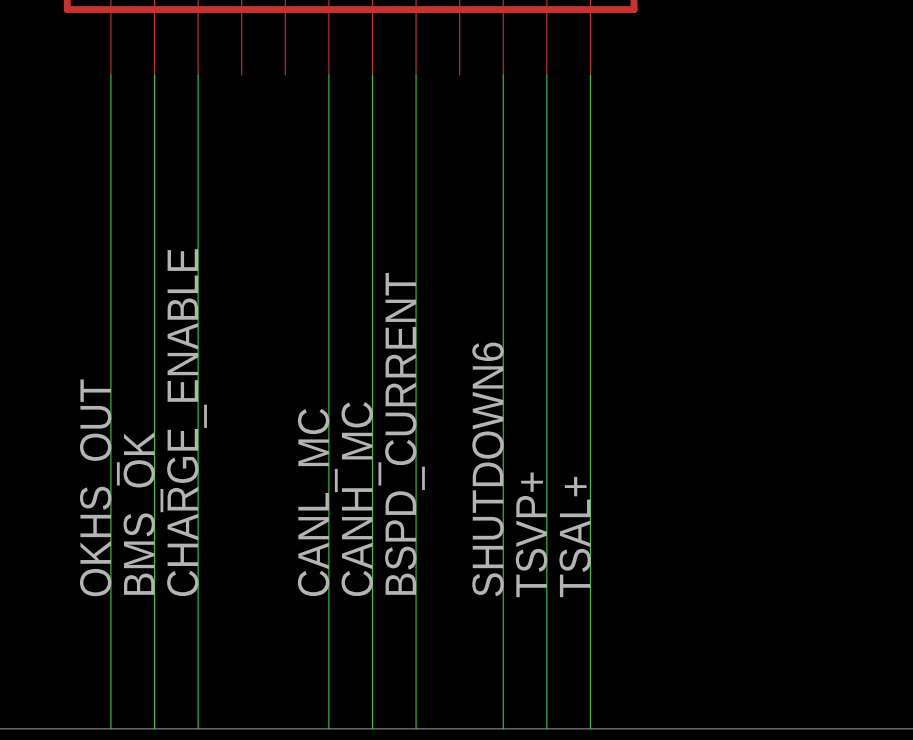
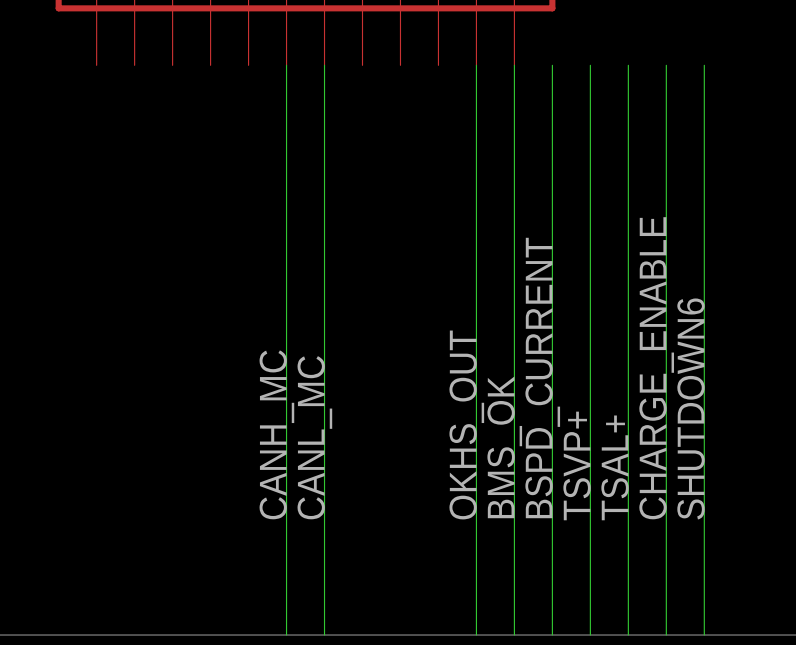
wire: (110, 74) (110, 728) -> none
wire: (154, 74) (154, 728) -> none
wire: (198, 74) (198, 728) -> none
wire: (416, 74) (416, 728) -> (552, 65) (552, 635)
wire: (503, 74) (503, 728) -> (628, 65) (628, 635)
wire: none -> (590, 65) (590, 635)
wire: none -> (666, 65) (666, 635)
wire: none -> (704, 65) (704, 635)
label: CHARGE_ENABLE (187, 422) -> none
label: none -> CHARGE_ENABLE (656, 368)
label position: BSPD_CURRENT (404, 433) -> BSPD_CURRENT (542, 378)
label position: SHUTDOWN6 (487, 469) -> SHUTDOWN6 (691, 408)
label: OKHS_OUT (99, 487) -> none
label: CANH_MC (361, 499) -> CANL_MC (314, 437)
label: CANL_MC (317, 502) -> CANH_MC (276, 434)
label: BMS_OK (143, 513) -> none
label: TSVP+ (531, 534) -> OKHS_OUT (466, 424)
label: none -> TSVP+ (577, 465)
label: TSAL+ (575, 537) -> BMS_OK (504, 447)
label: none -> TSAL+ (615, 467)

